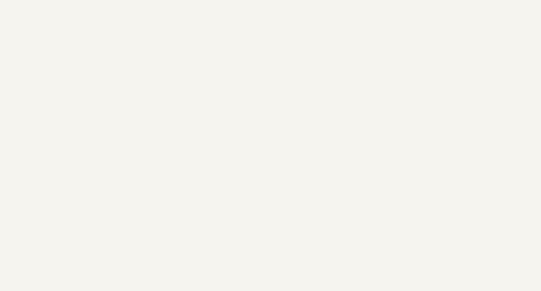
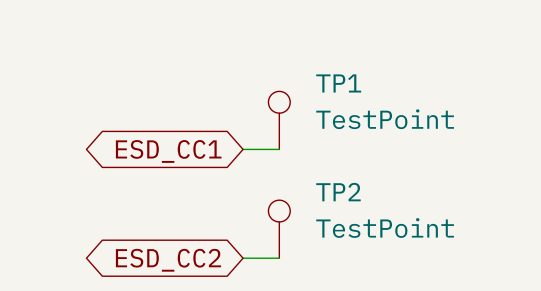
TP1: none -> TestPoint (279, 120)
wire: none -> (243, 149) (279, 149)
global label: none -> ESD_CC1 (168, 151)
TP2: none -> TestPoint (279, 229)
wire: none -> (243, 258) (279, 258)
global label: none -> ESD_CC2 (168, 260)

